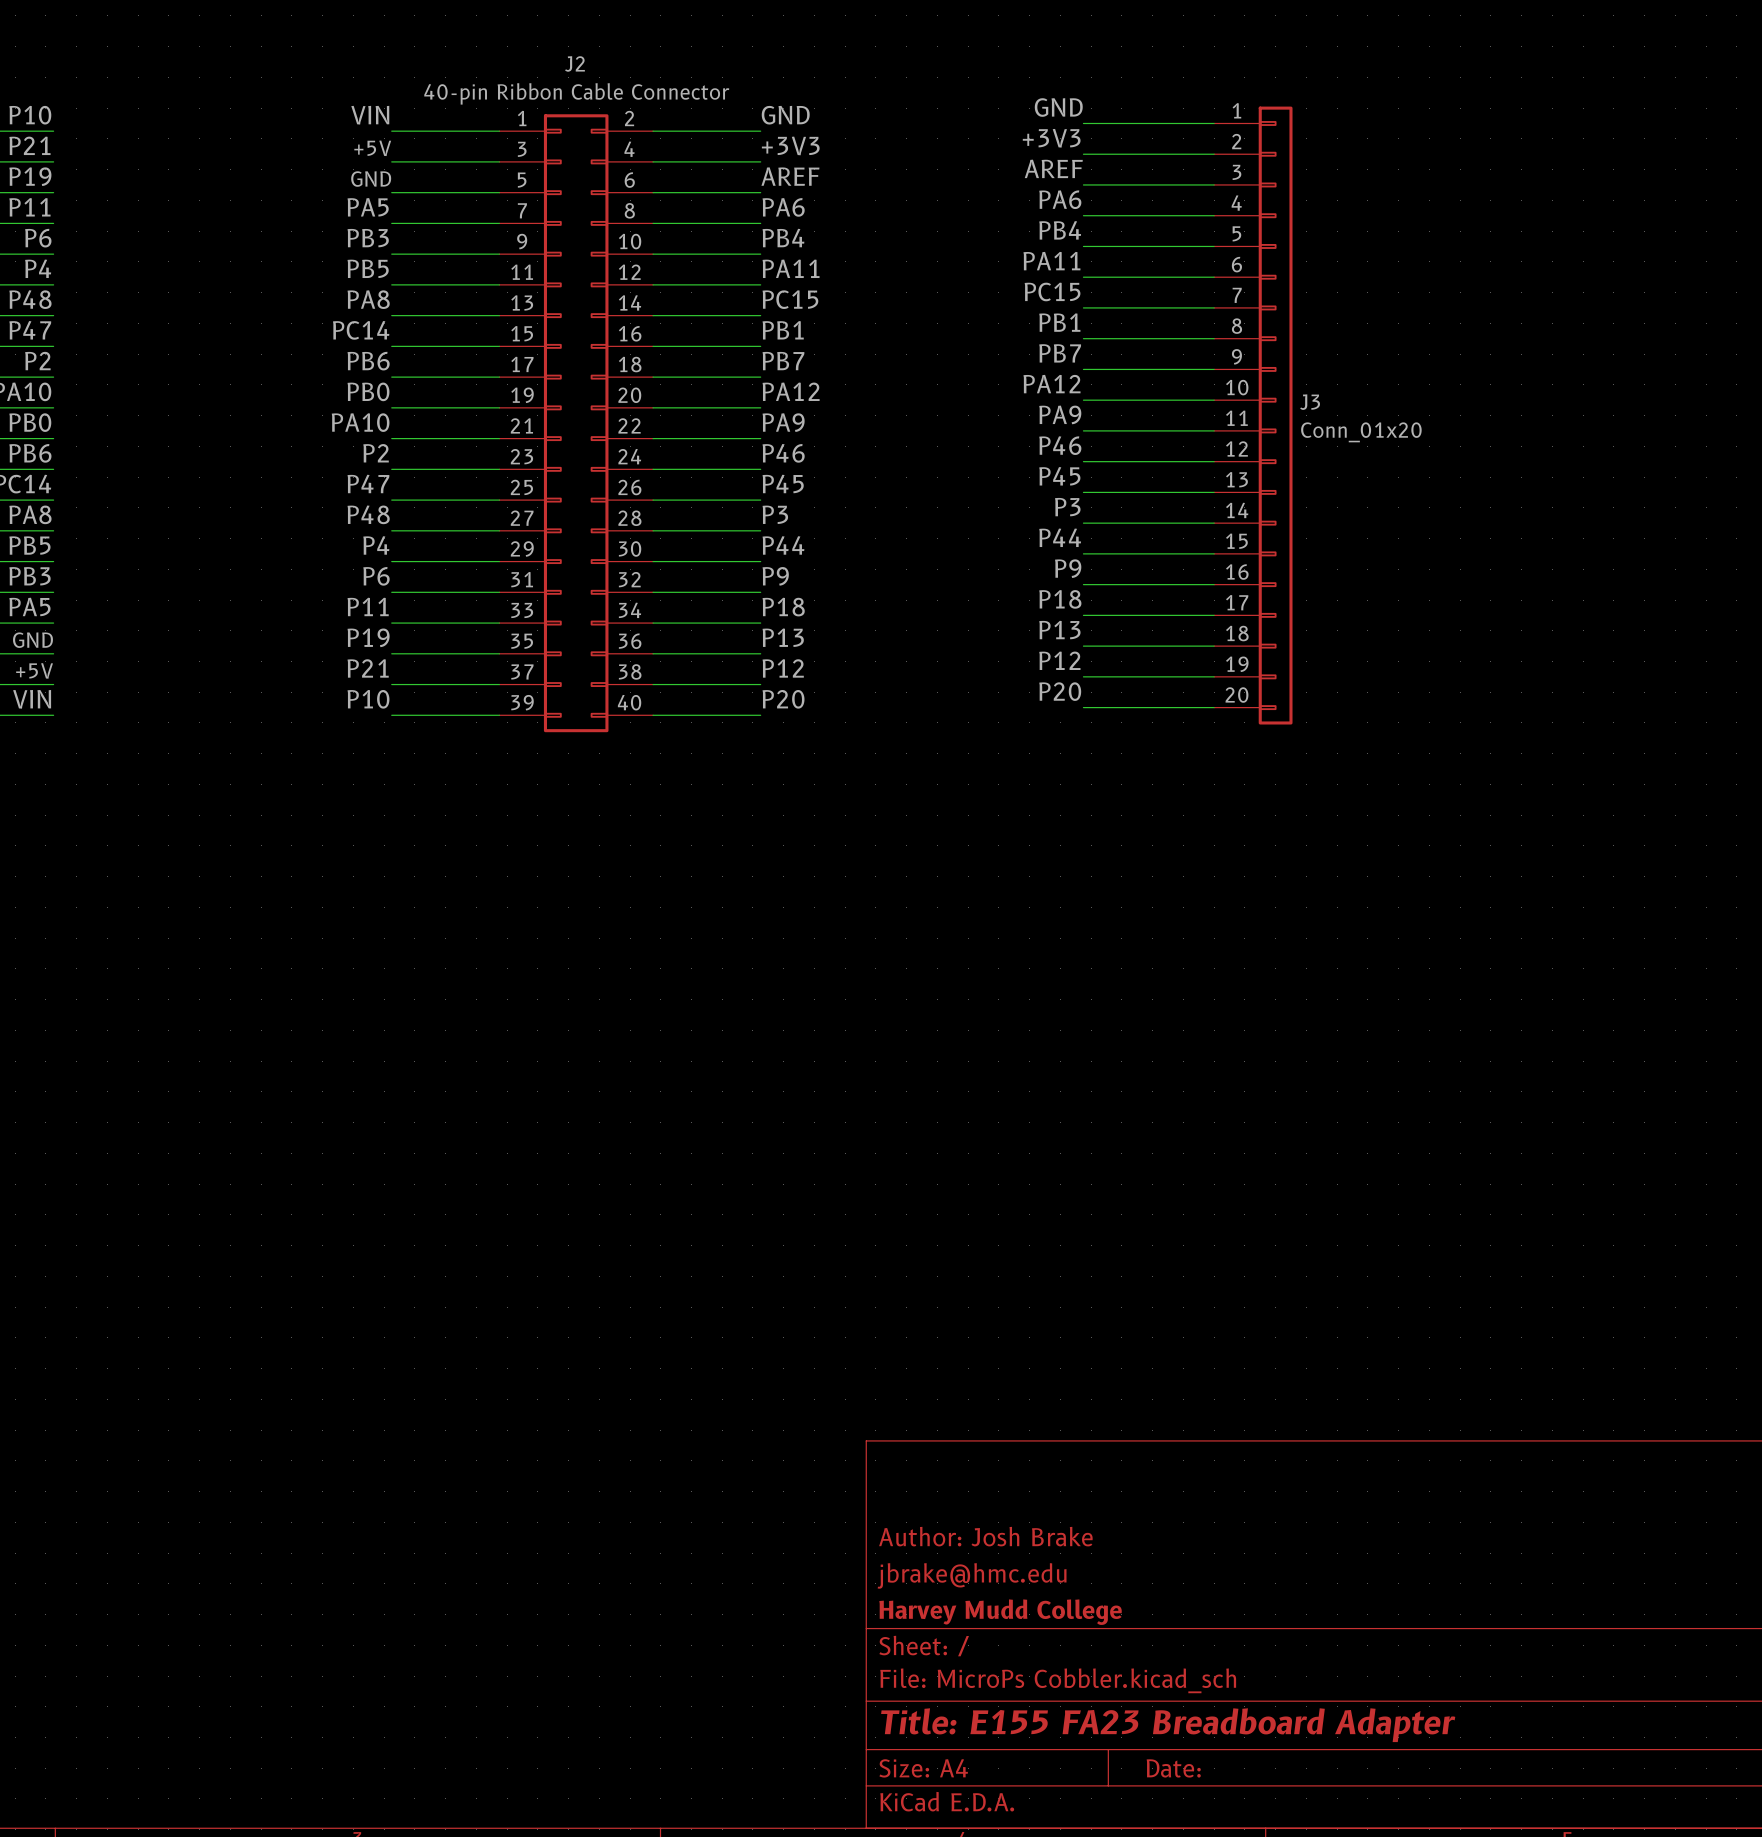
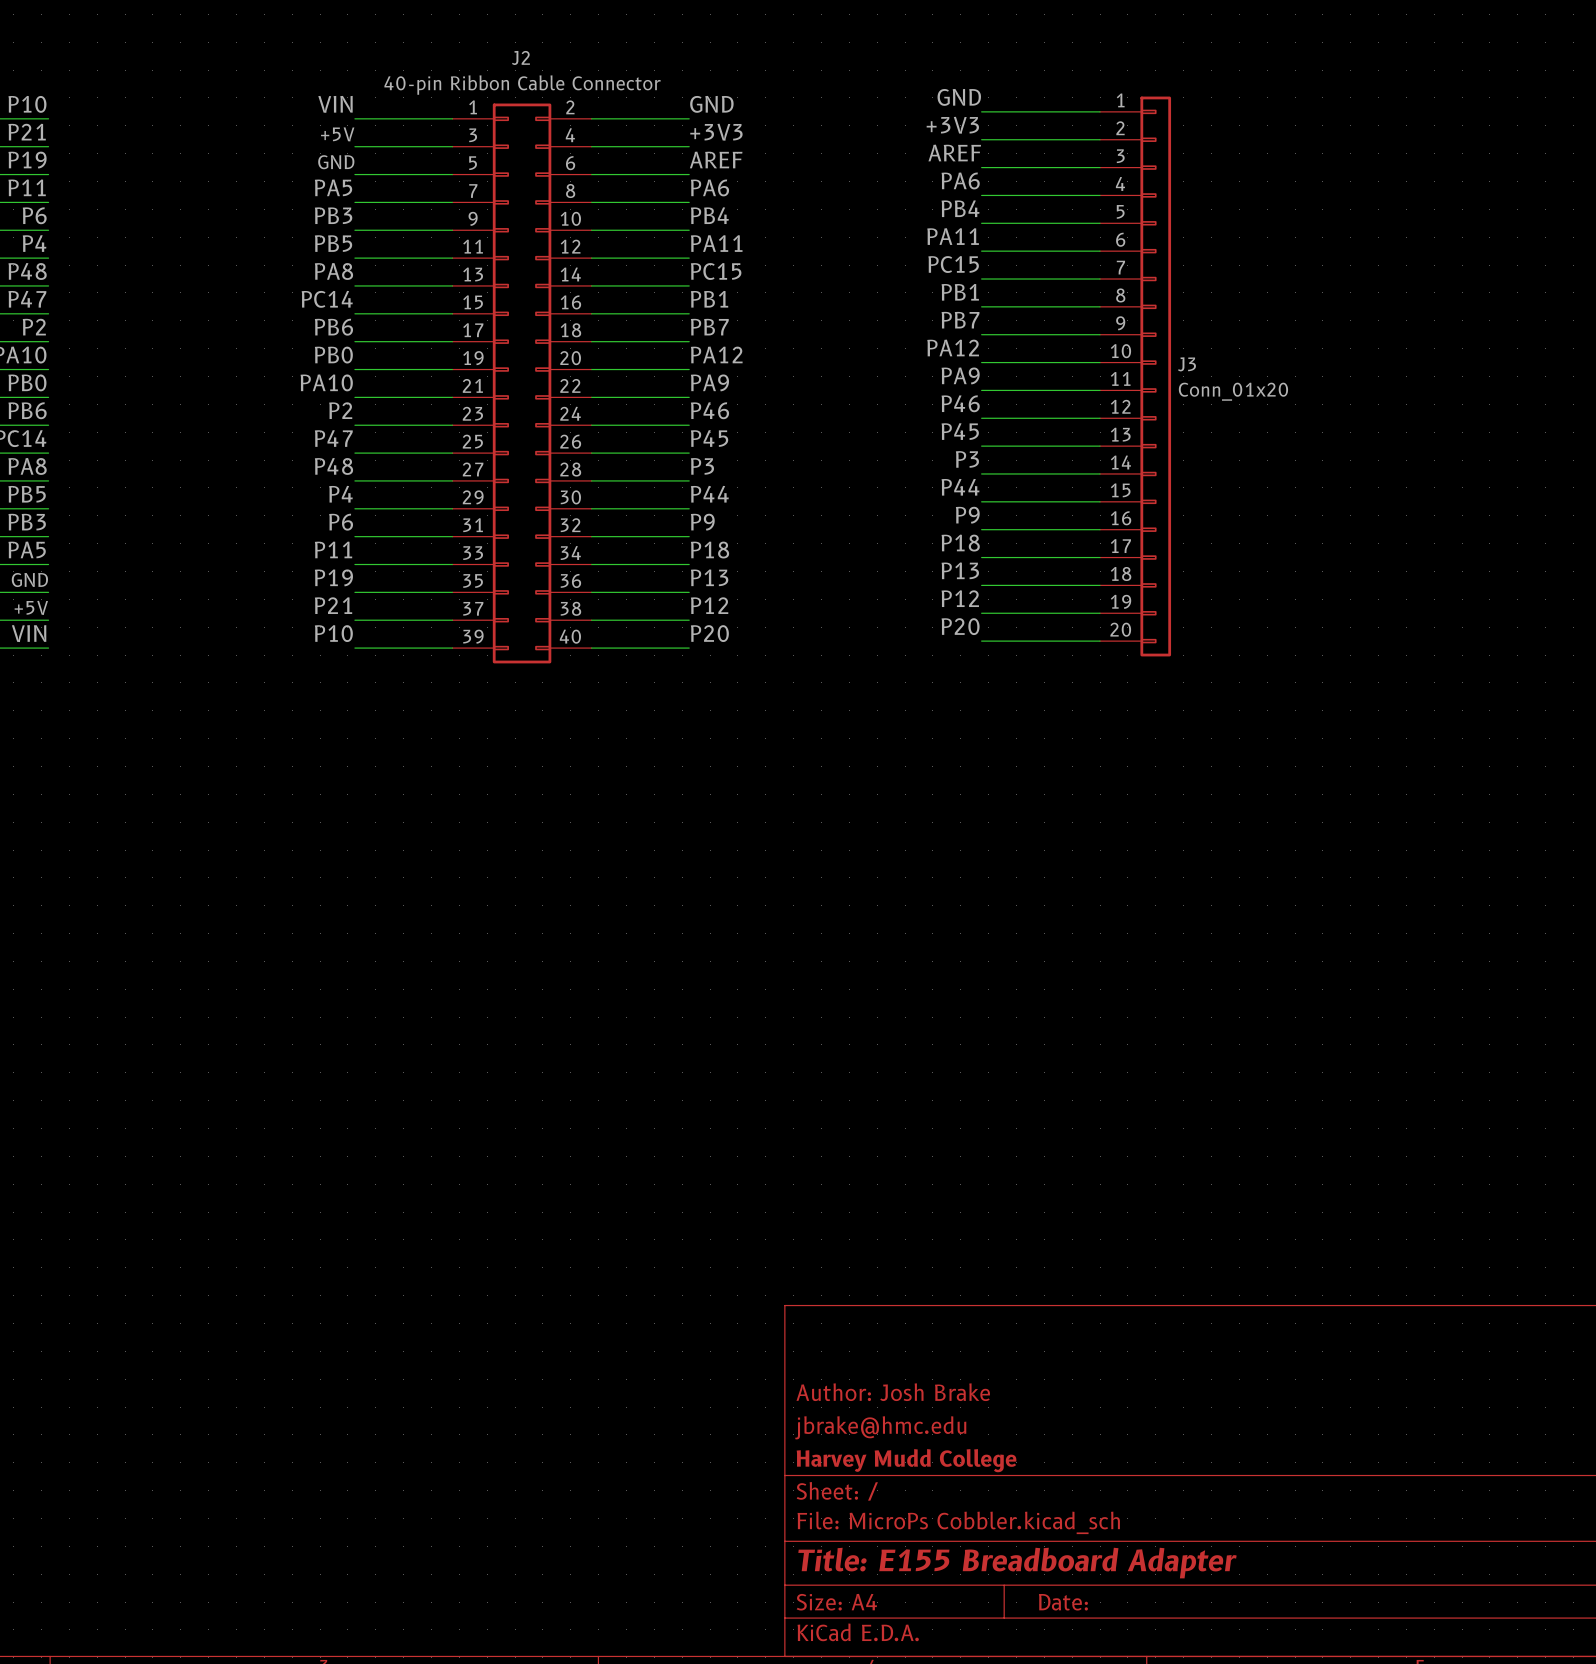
title block: Title: E155 FA23 Breadboard Adapter (1168, 1725) -> Title: E155 Breadboard Adapter (1017, 1563)

